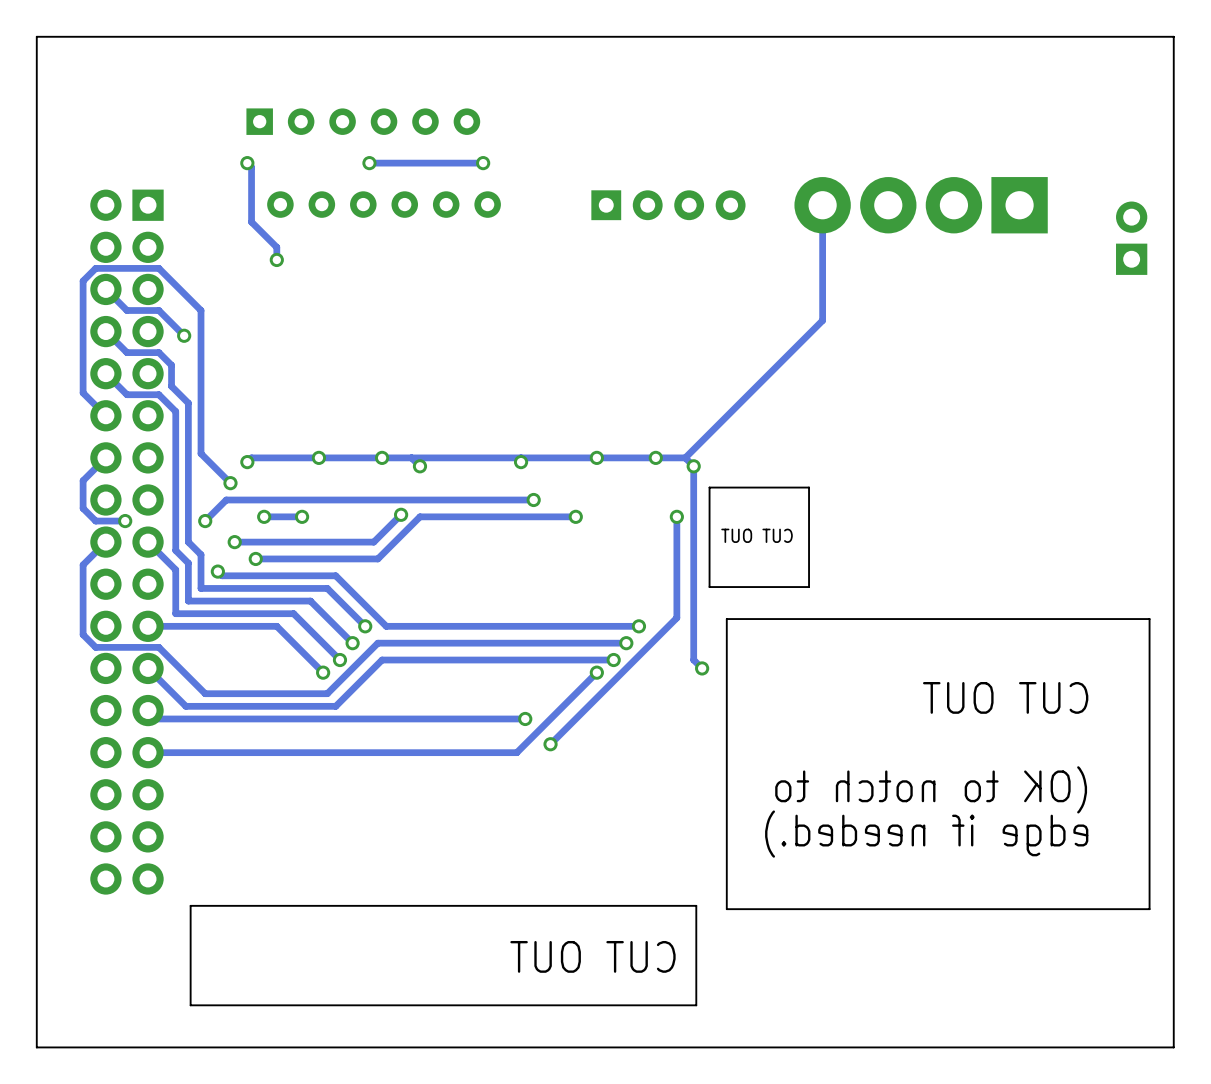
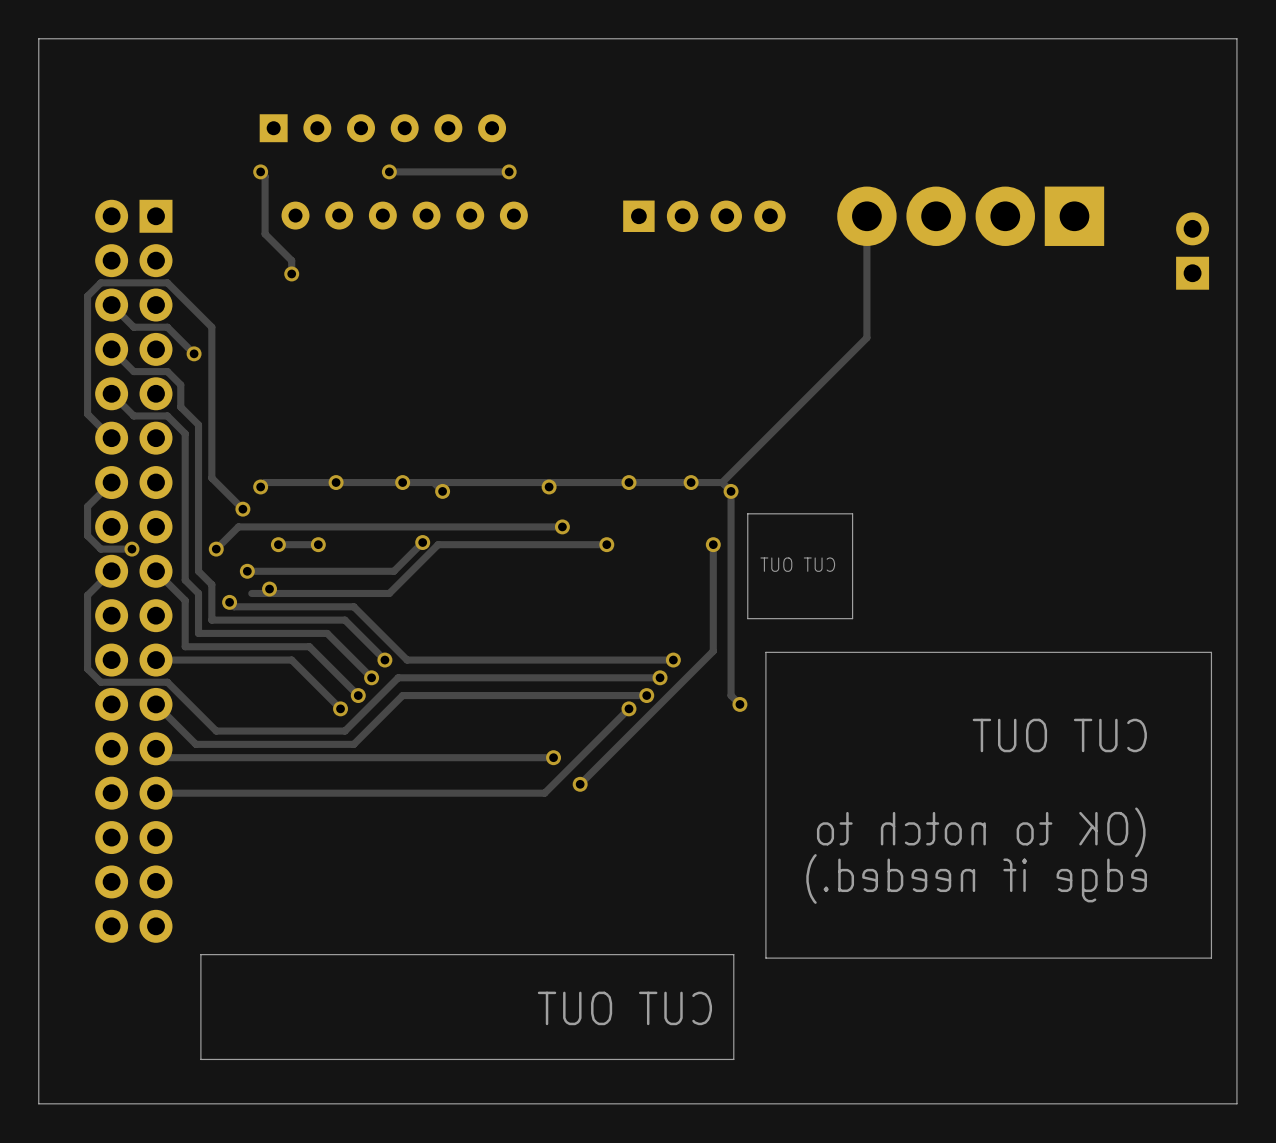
track: (419, 516) (377, 558) (255, 558) -> (442, 544) (438, 544) (389, 593) (251, 593)

